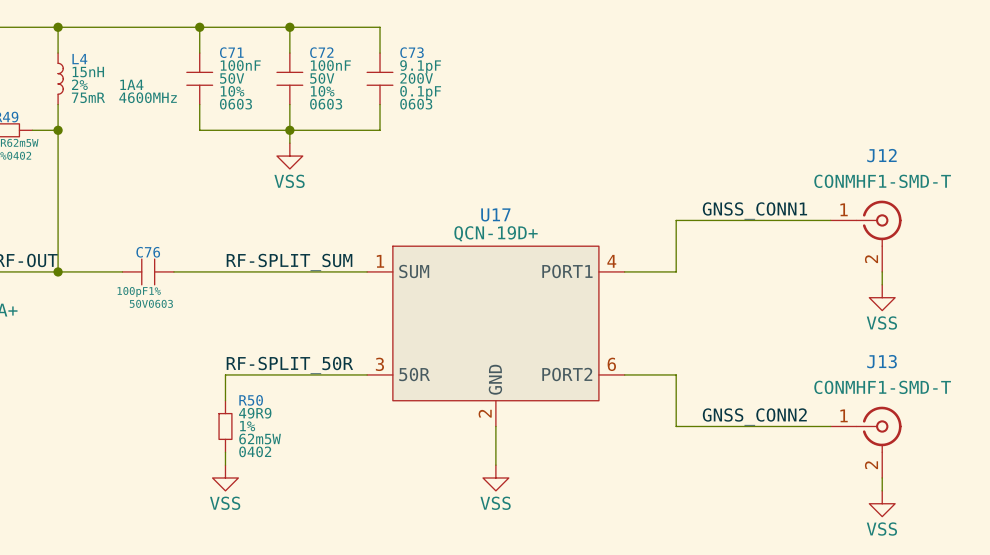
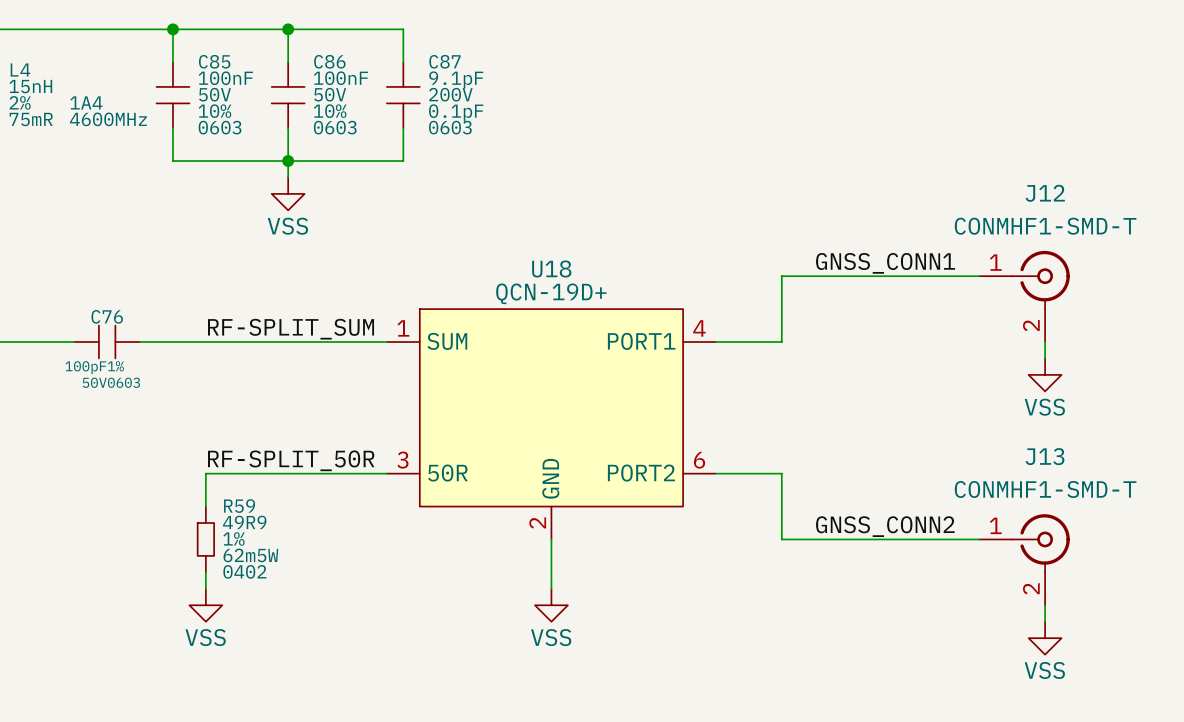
C71 name: C71 (231, 52) -> C85 (214, 61)
C72 name: C72 (321, 52) -> C86 (329, 61)
C73 name: C73 (412, 52) -> C87 (445, 61)
U17 name: U17 (495, 214) -> U18 (551, 268)
R50 name: R50 (251, 400) -> R59 (239, 506)

